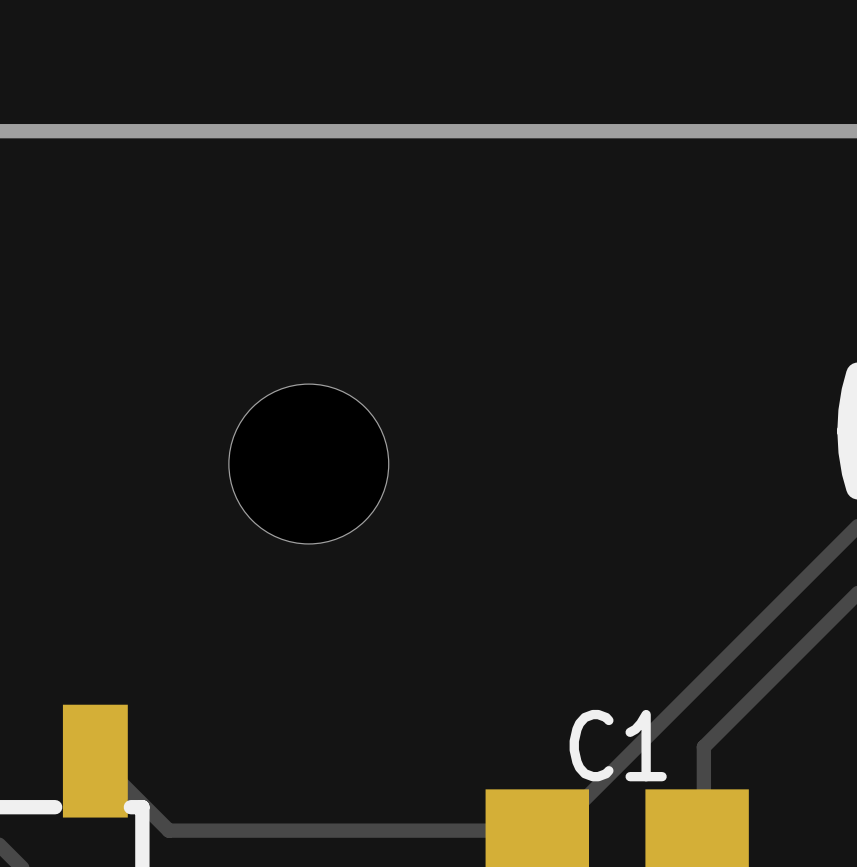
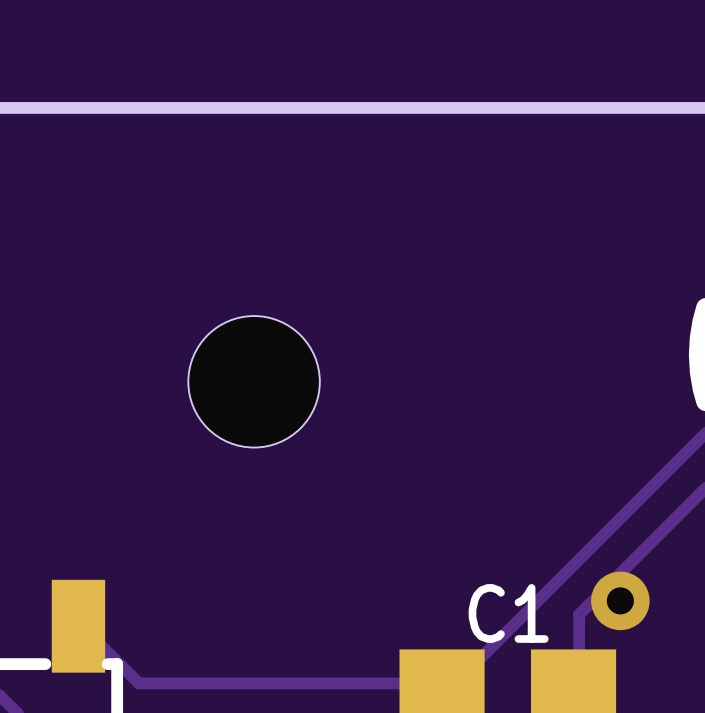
via: none -> (620, 600)

